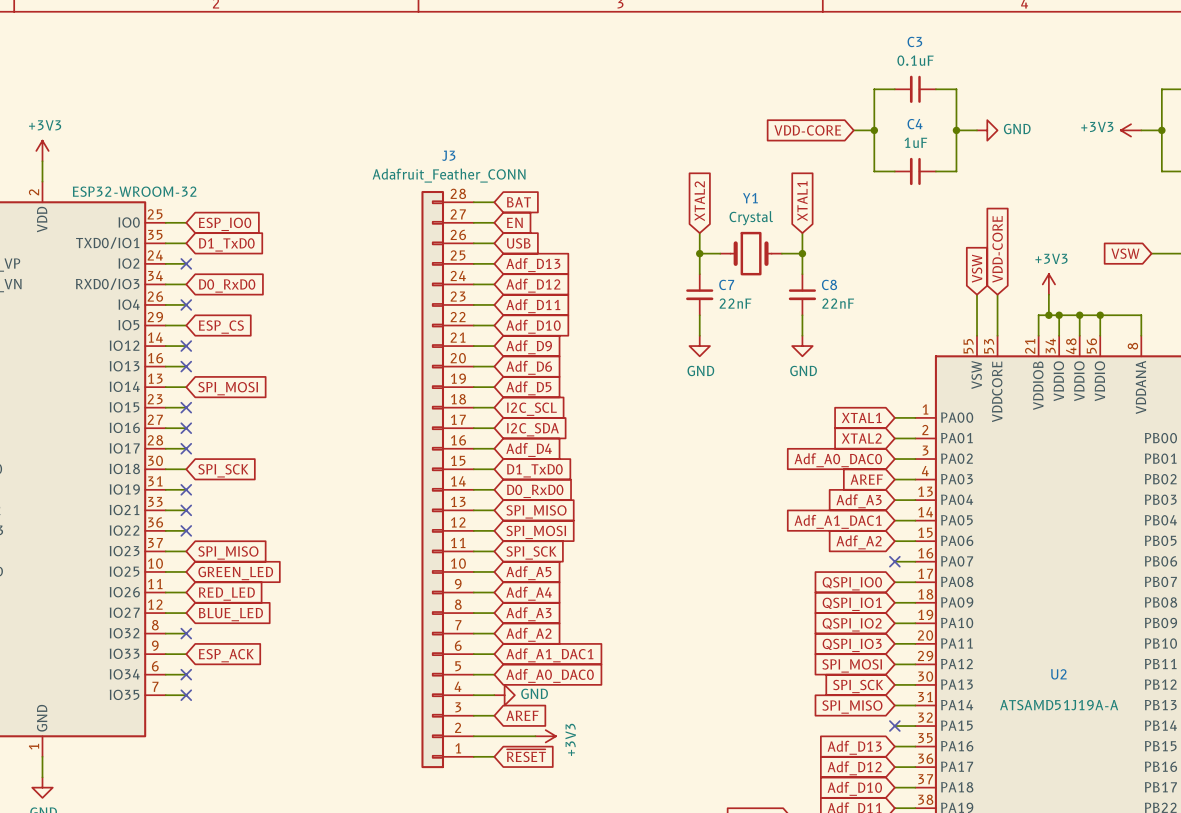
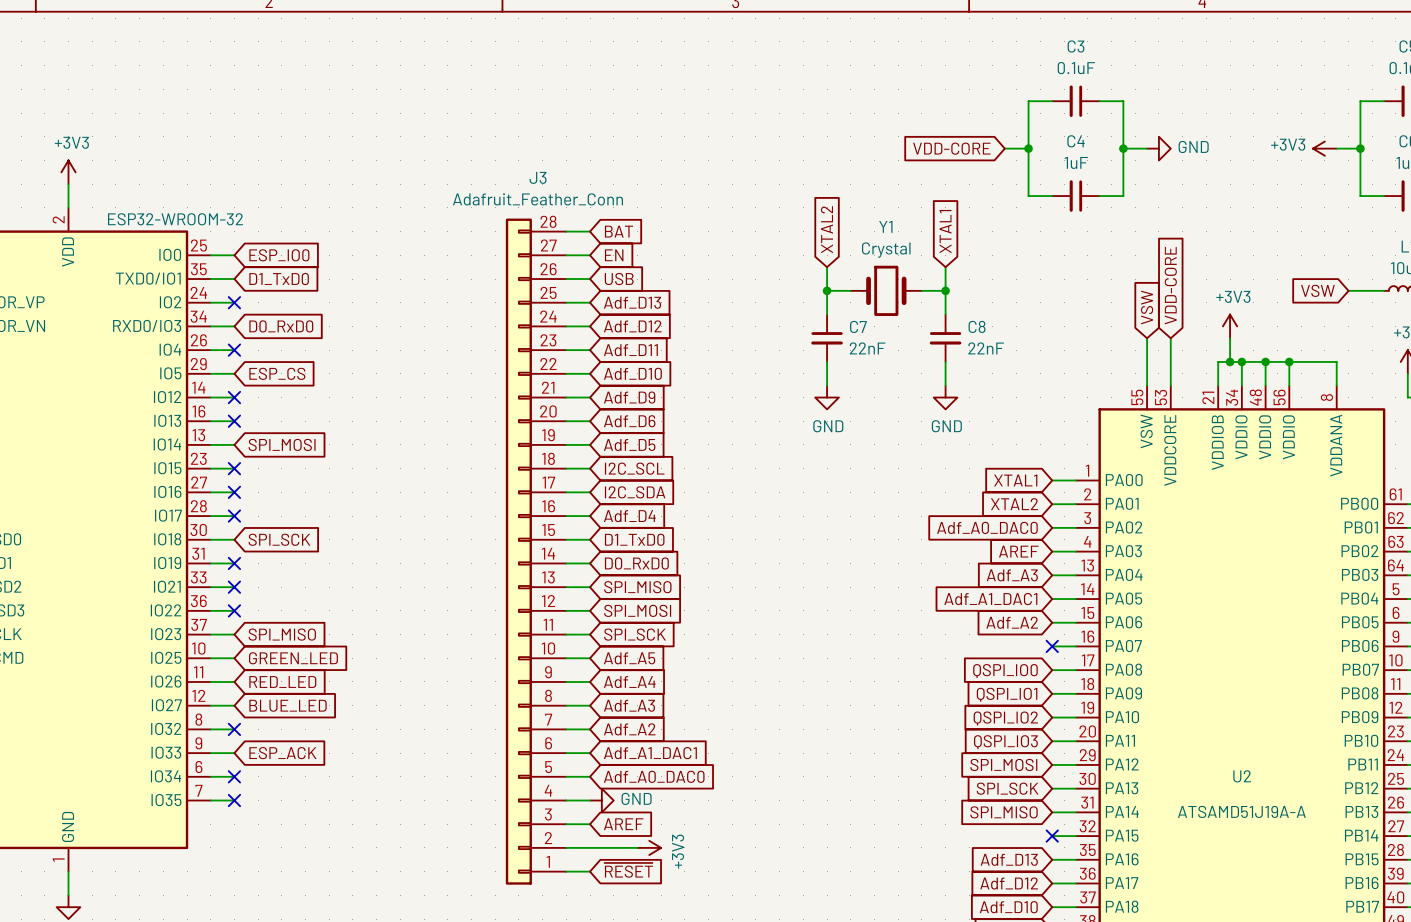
J3 value: Adafruit_Feather_CONN (449, 175) -> Adafruit_Feather_Conn (537, 199)

